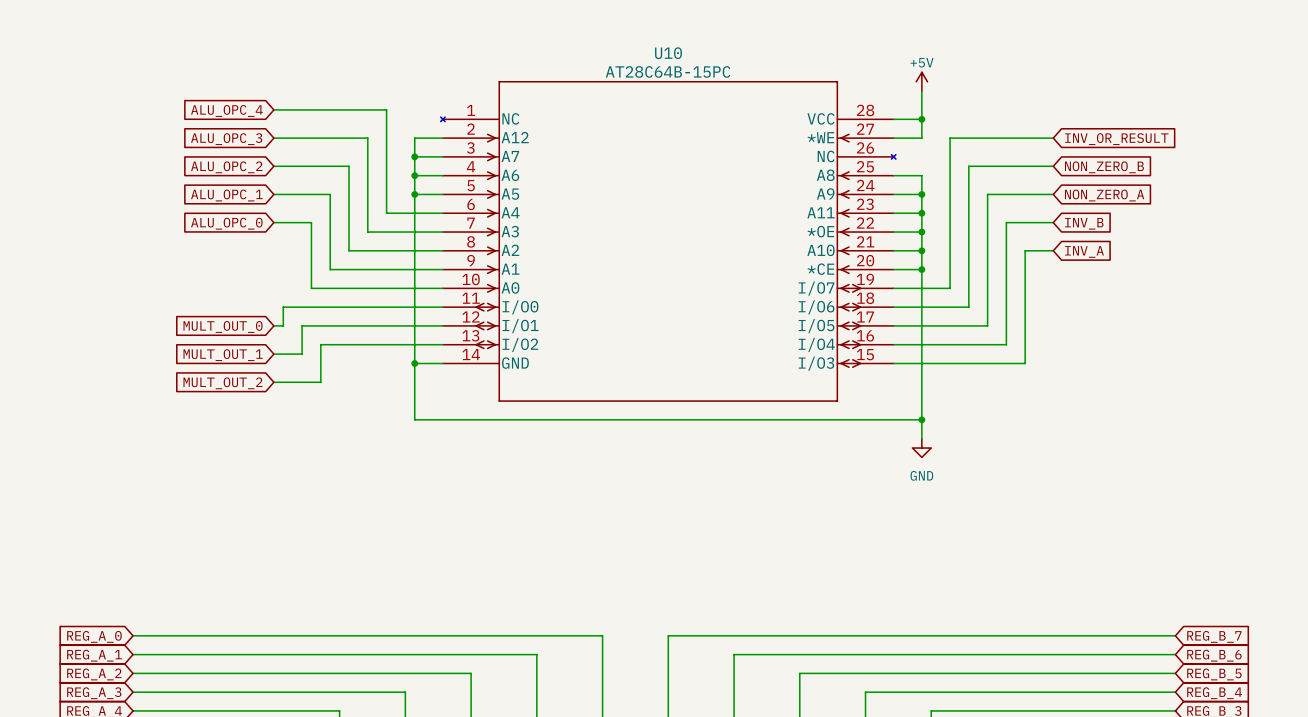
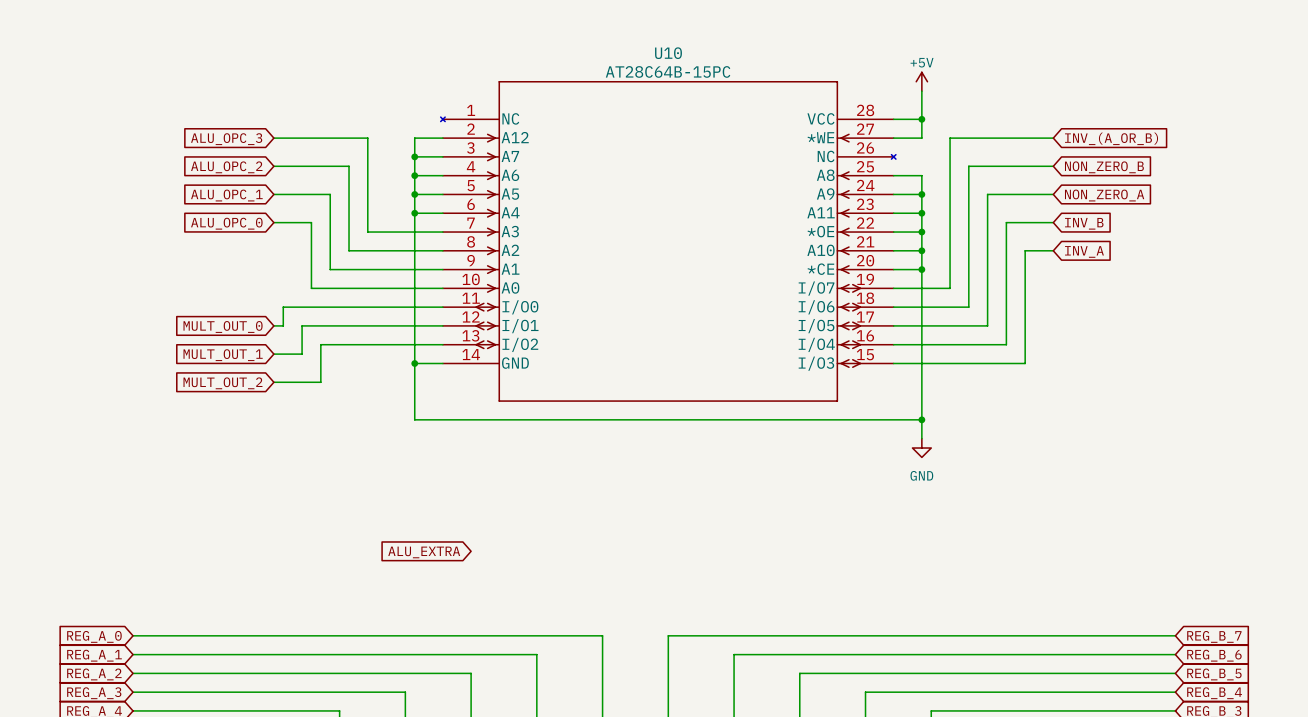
wire: (273, 109) (386, 109) (386, 213) (414, 213) -> none
global label: ALU_OPC_4 (226, 110) -> none
global label: INV_OR_RESULT (1116, 139) -> INV_(A_OR_B) (1111, 138)
junction: none -> (414, 213)
global label: none -> ALU_EXTRA (424, 552)

